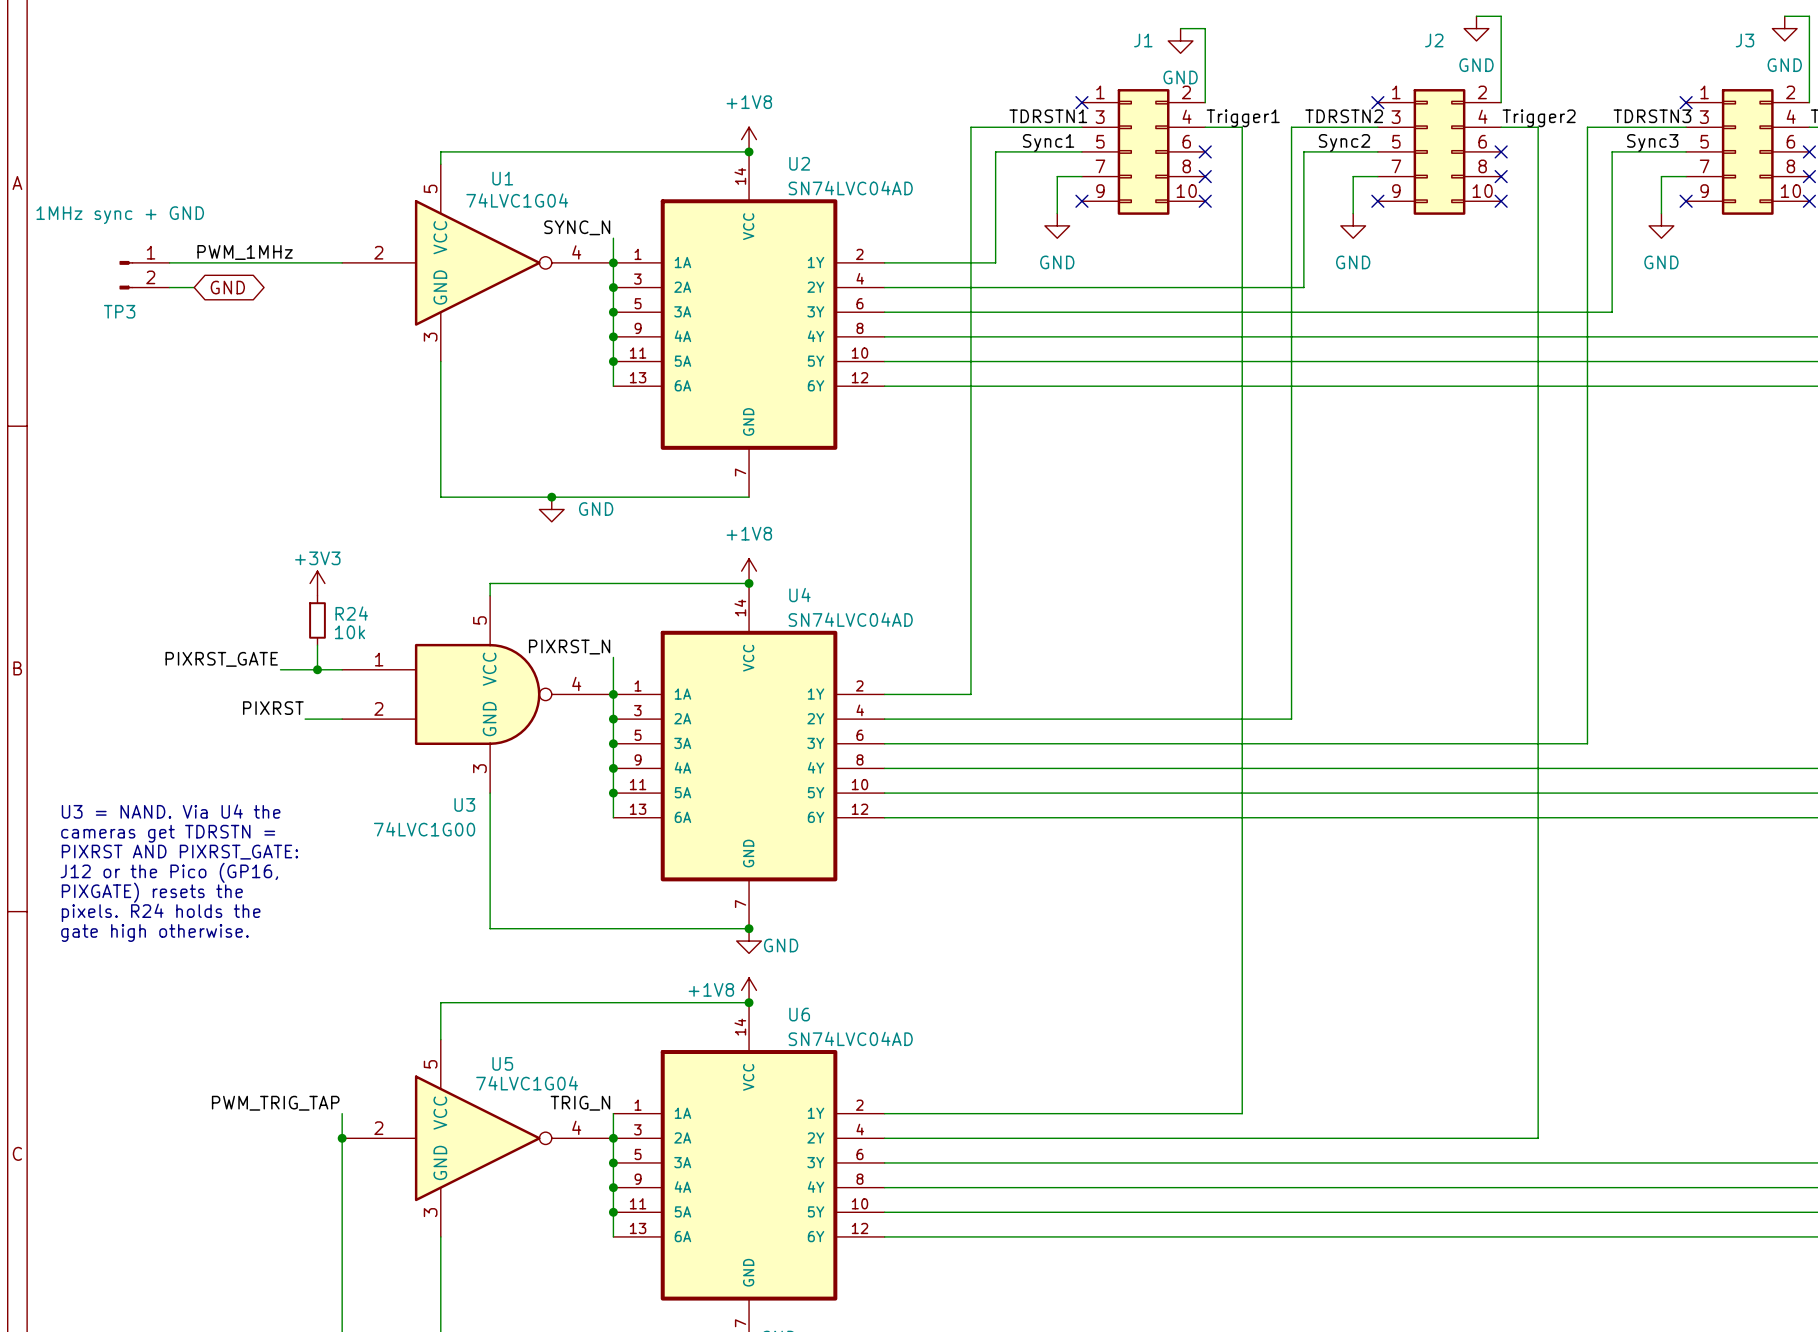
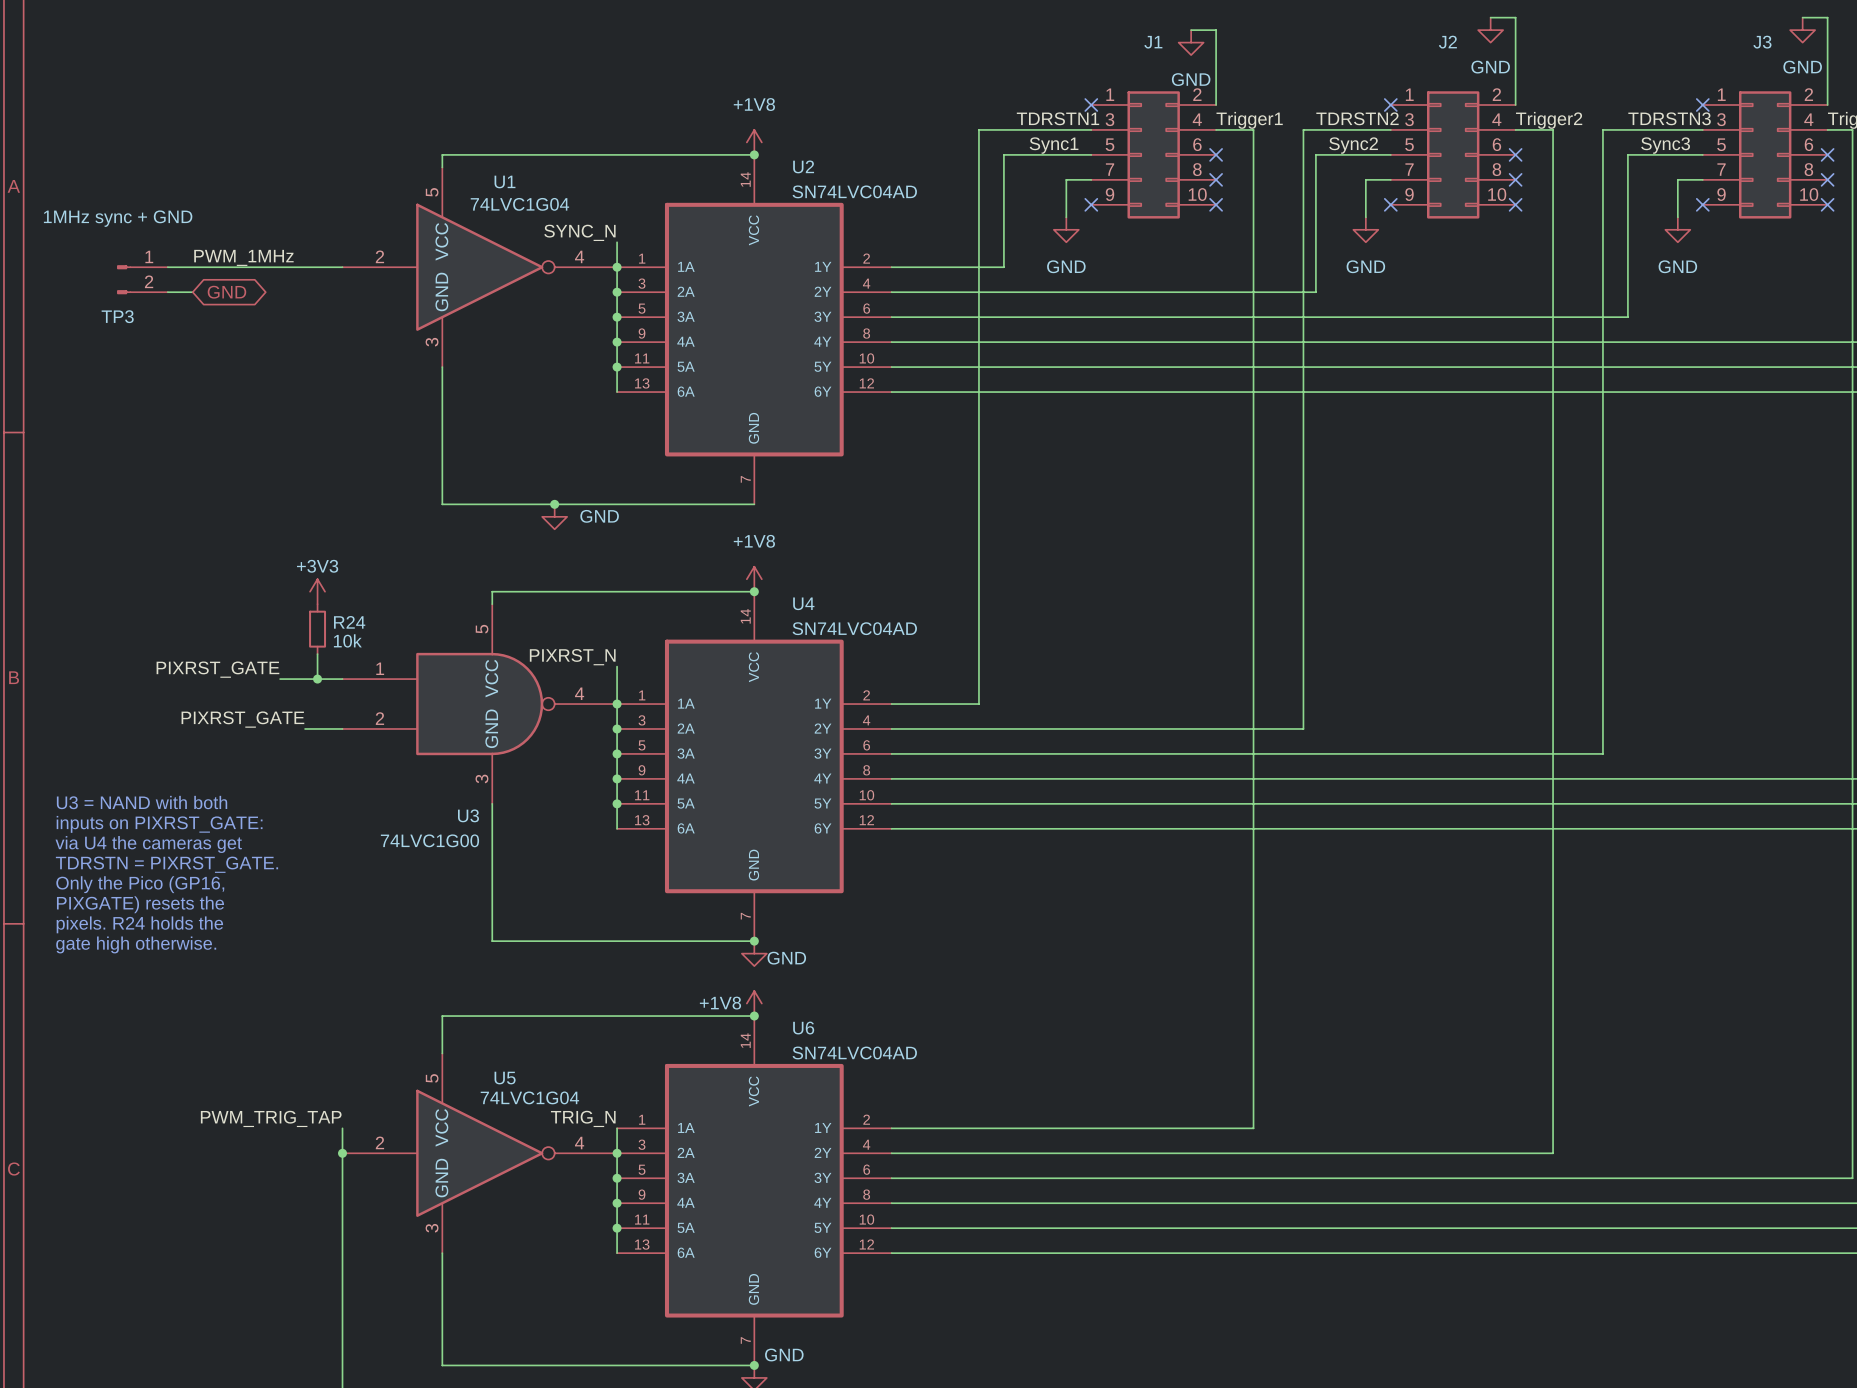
label: PIXRST (273, 708) -> PIXRST_GATE (242, 719)
text: none -> U3 = NAND with both (142, 802)
text: U3 = NAND. Via U4 the (171, 811) -> inputs on PIXRST_GATE: (159, 824)
text: cameras get TDRSTN = (168, 833) -> via U4 the cameras get (148, 844)
text: PIXRST AND PIXRST_GATE: (179, 852) -> TDRSTN = PIXRST_GATE. (166, 864)
text: J12 or the Pico (GP16, (169, 872) -> Only the Pico (GP16, (140, 884)

